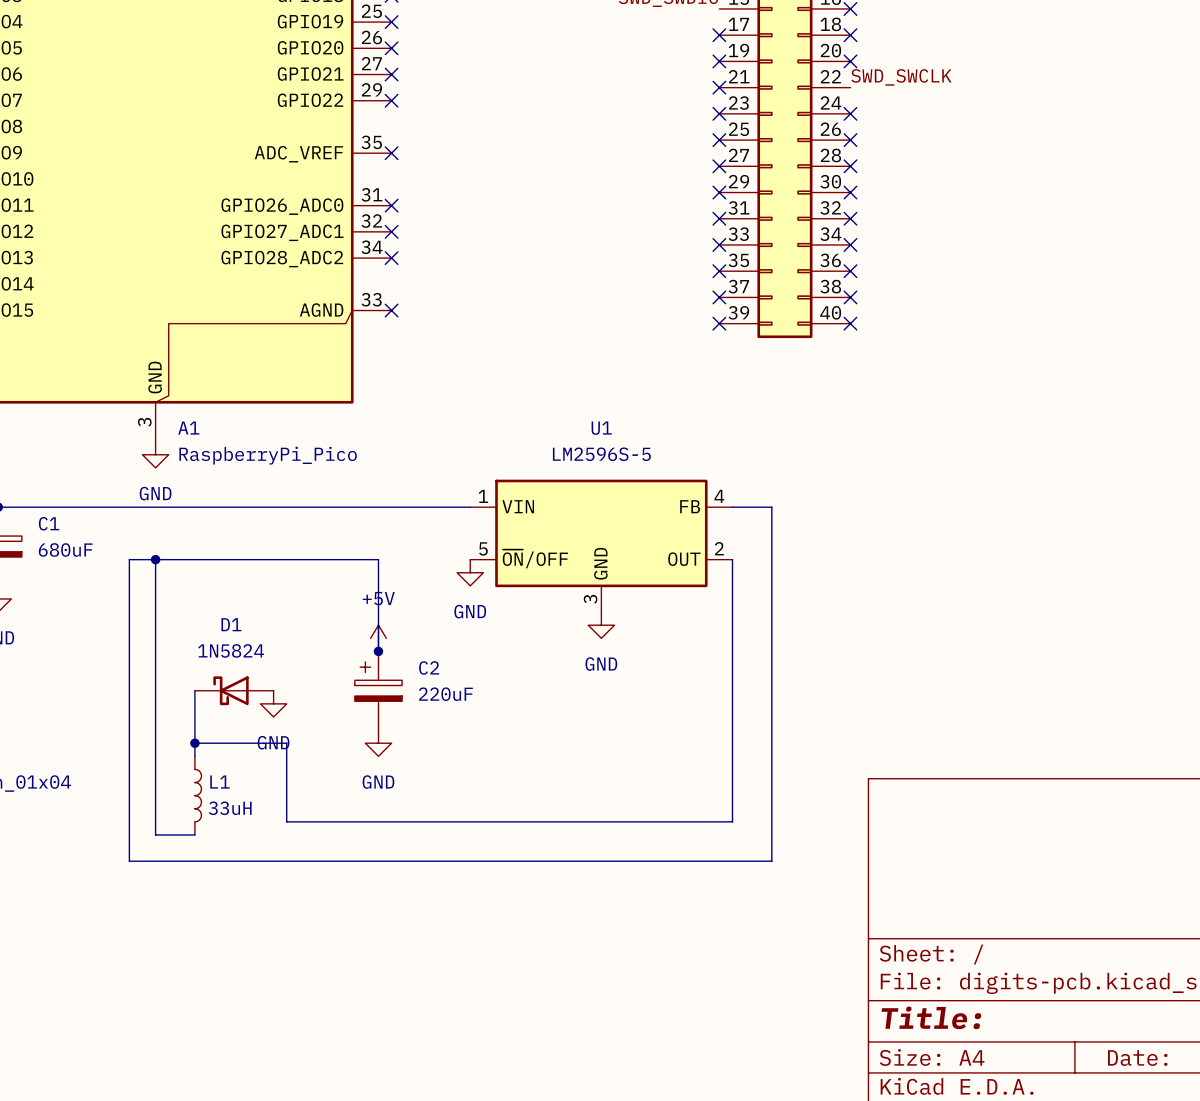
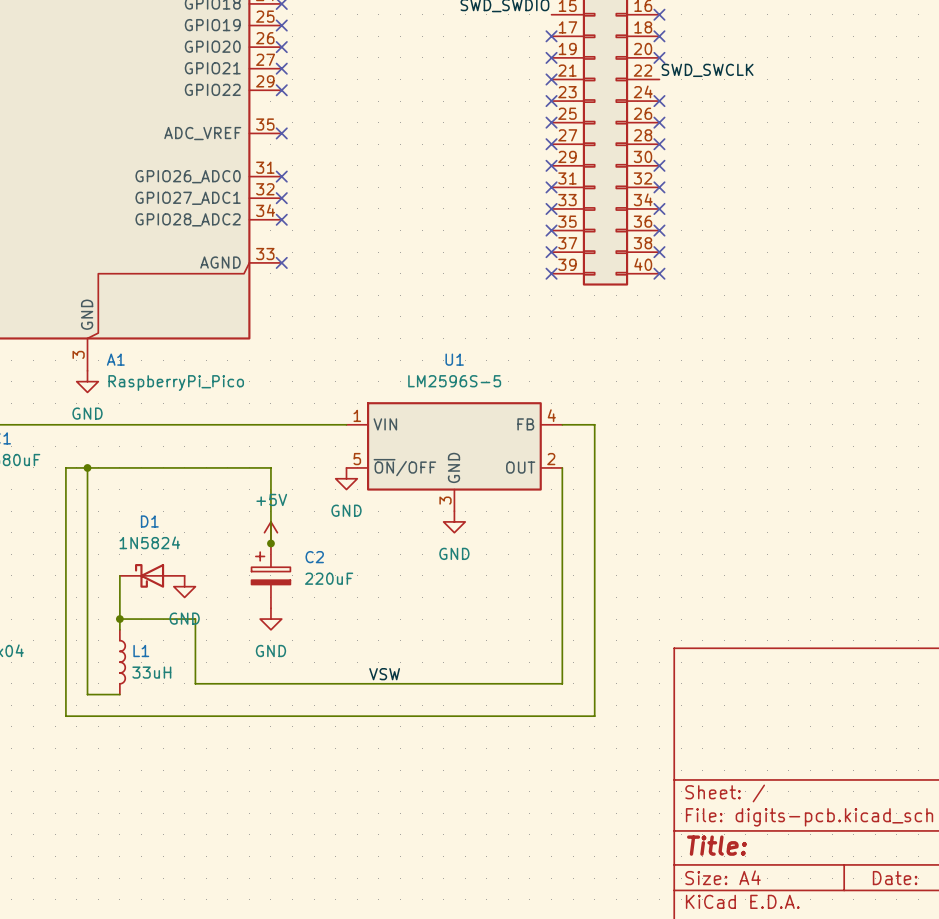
label: none -> VSW (384, 674)

